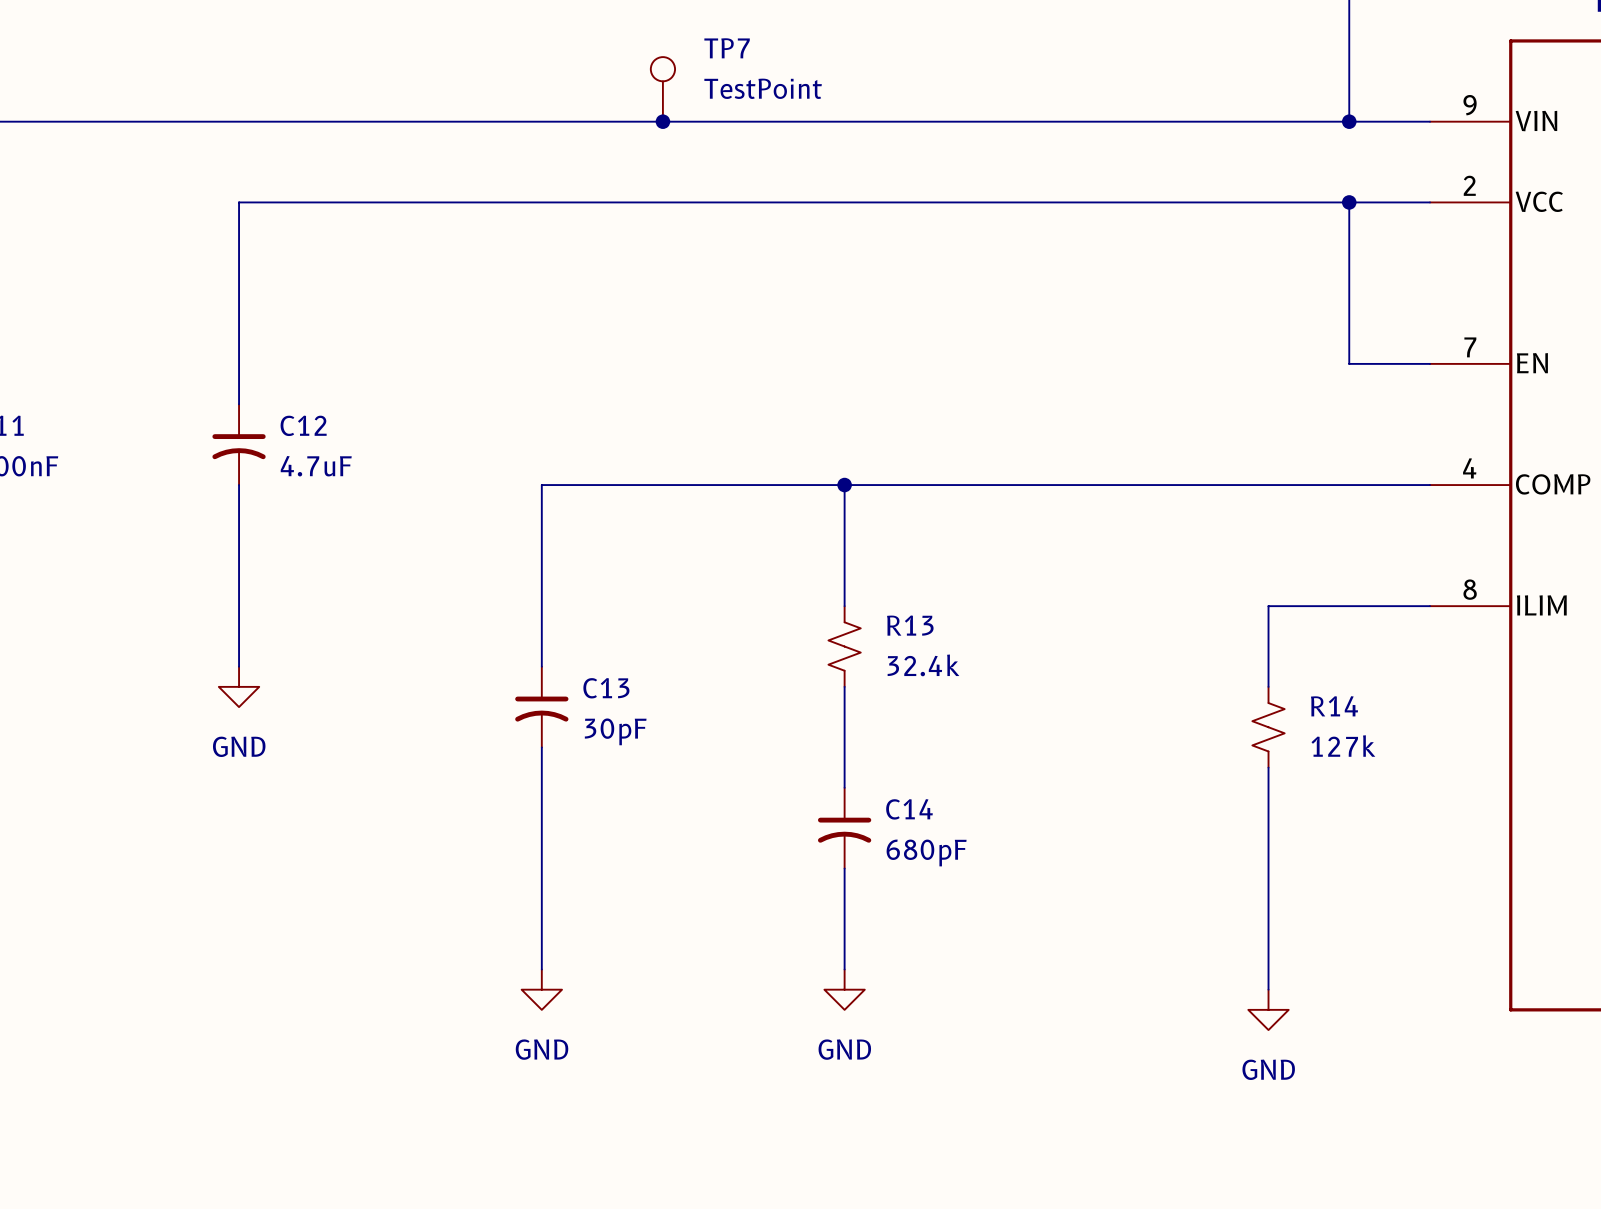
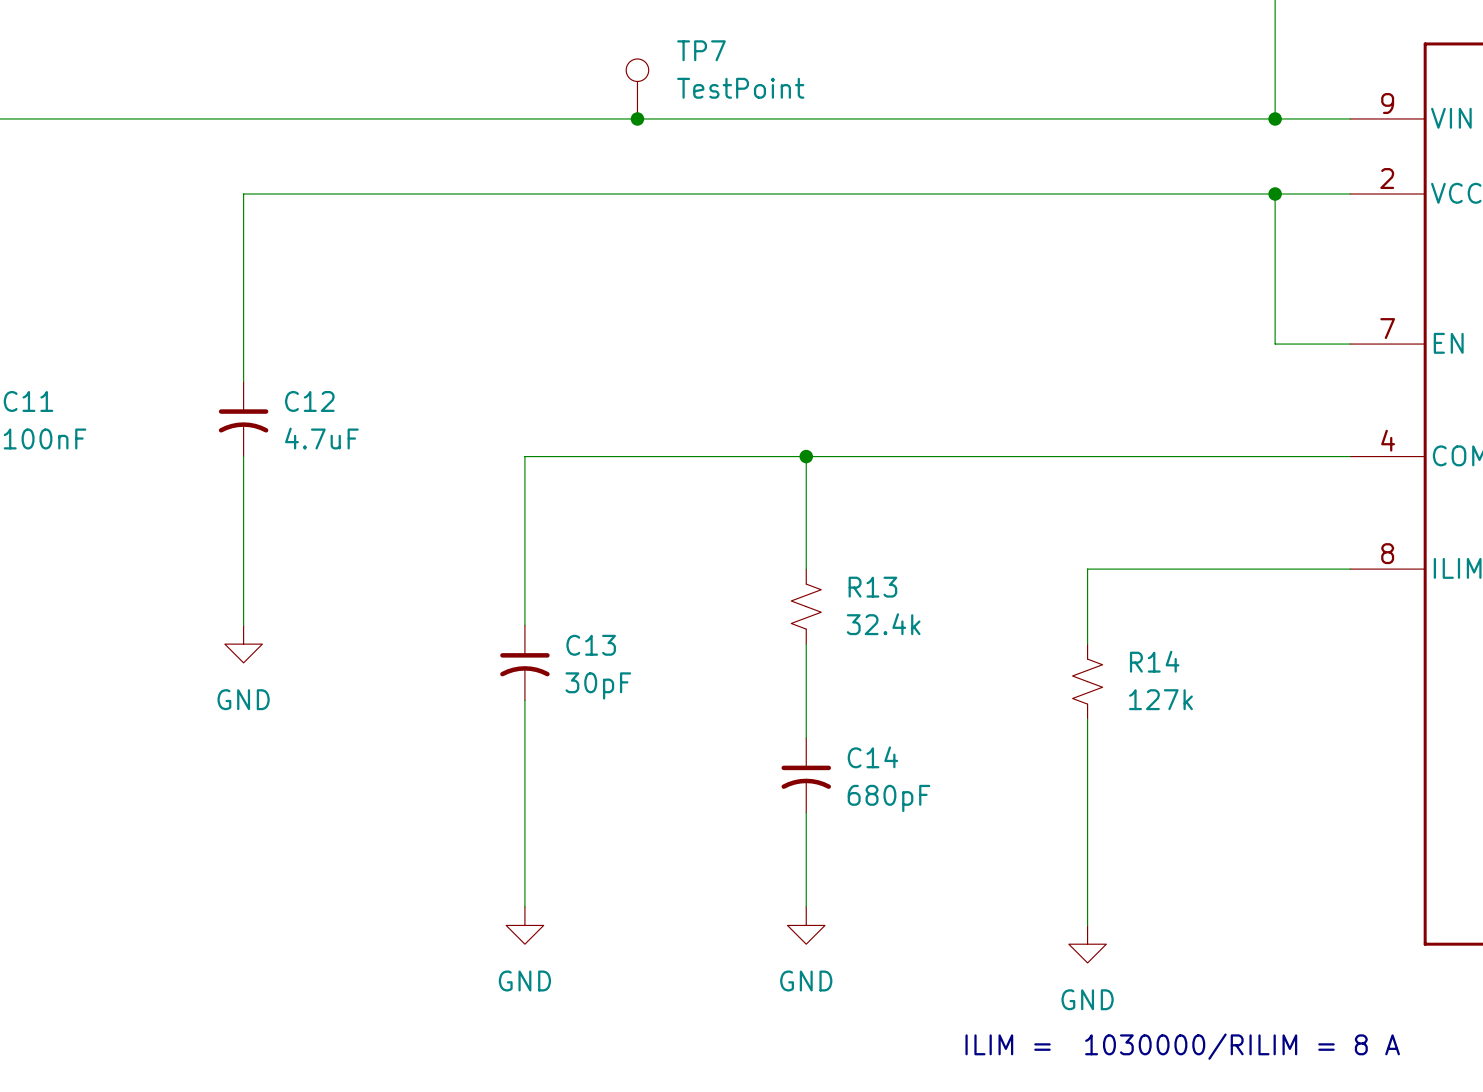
wire: (1268, 606) (1268, 686) -> (1200, 569) (1087, 569) (1087, 644)
R14 position: (1268, 727) -> (1087, 681)
wire: (1268, 767) (1268, 989) -> (1087, 719) (1087, 925)
power symbol position: GND (1268, 1009) -> GND (1087, 944)
text: none -> ILIM = 1030000/RILIM = 8 A (1182, 1046)

